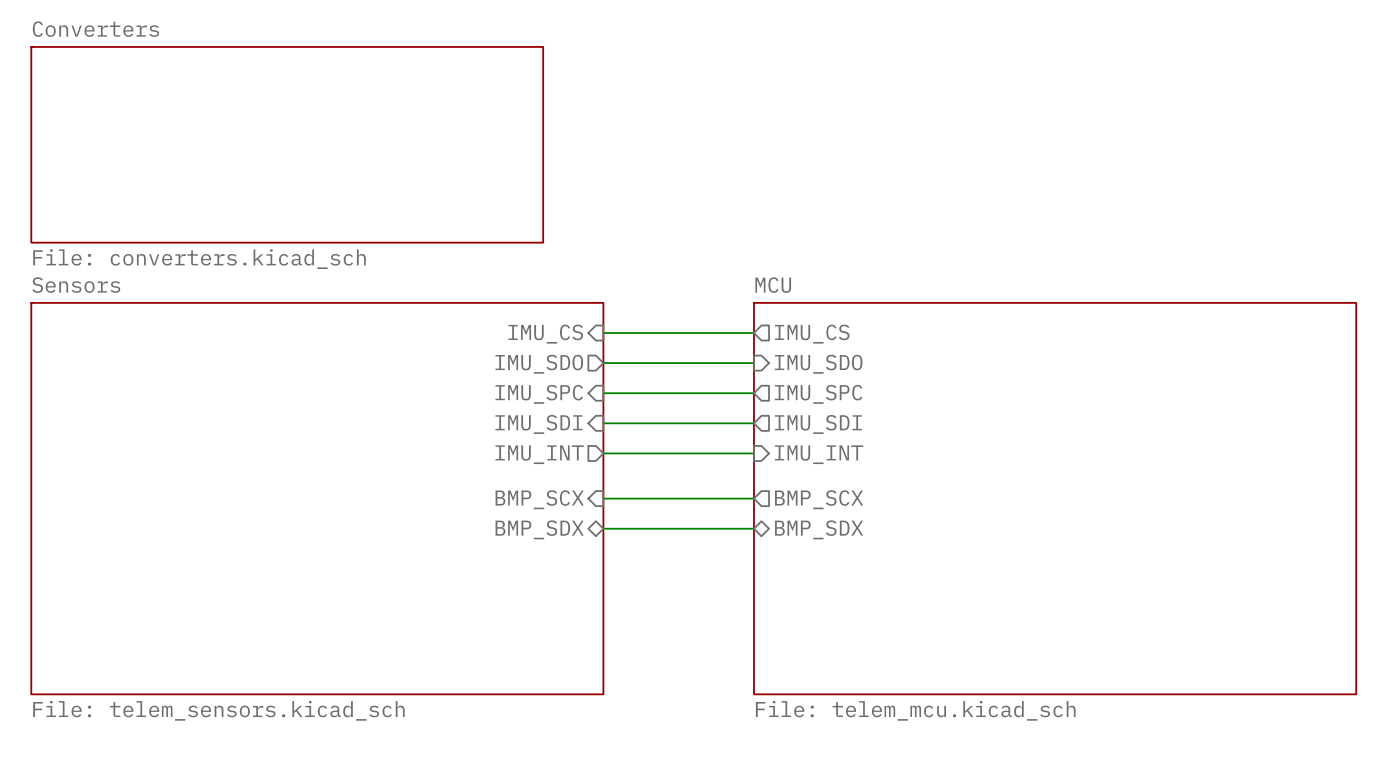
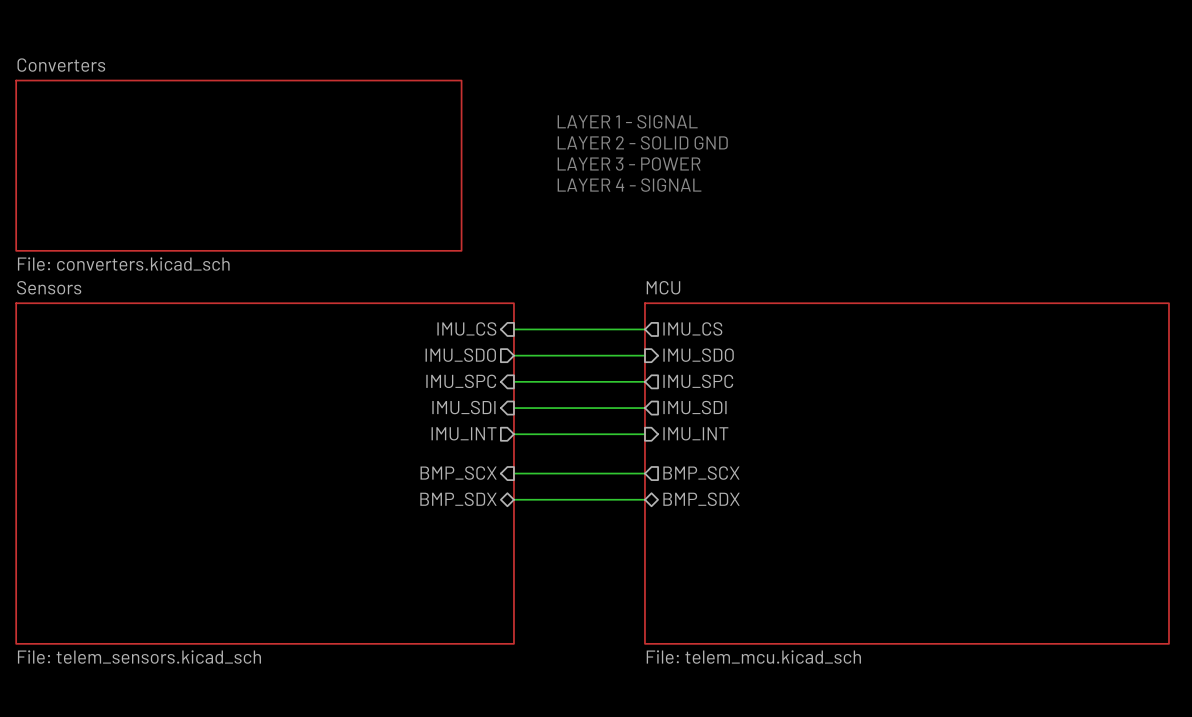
text: none -> LAYER 1 - SIGNAL (627, 121)
text: none -> LAYER 2 - SOLID GND (642, 142)
text: none -> LAYER 3 - POWER (629, 164)
text: none -> LAYER 4 - SIGNAL (629, 185)

